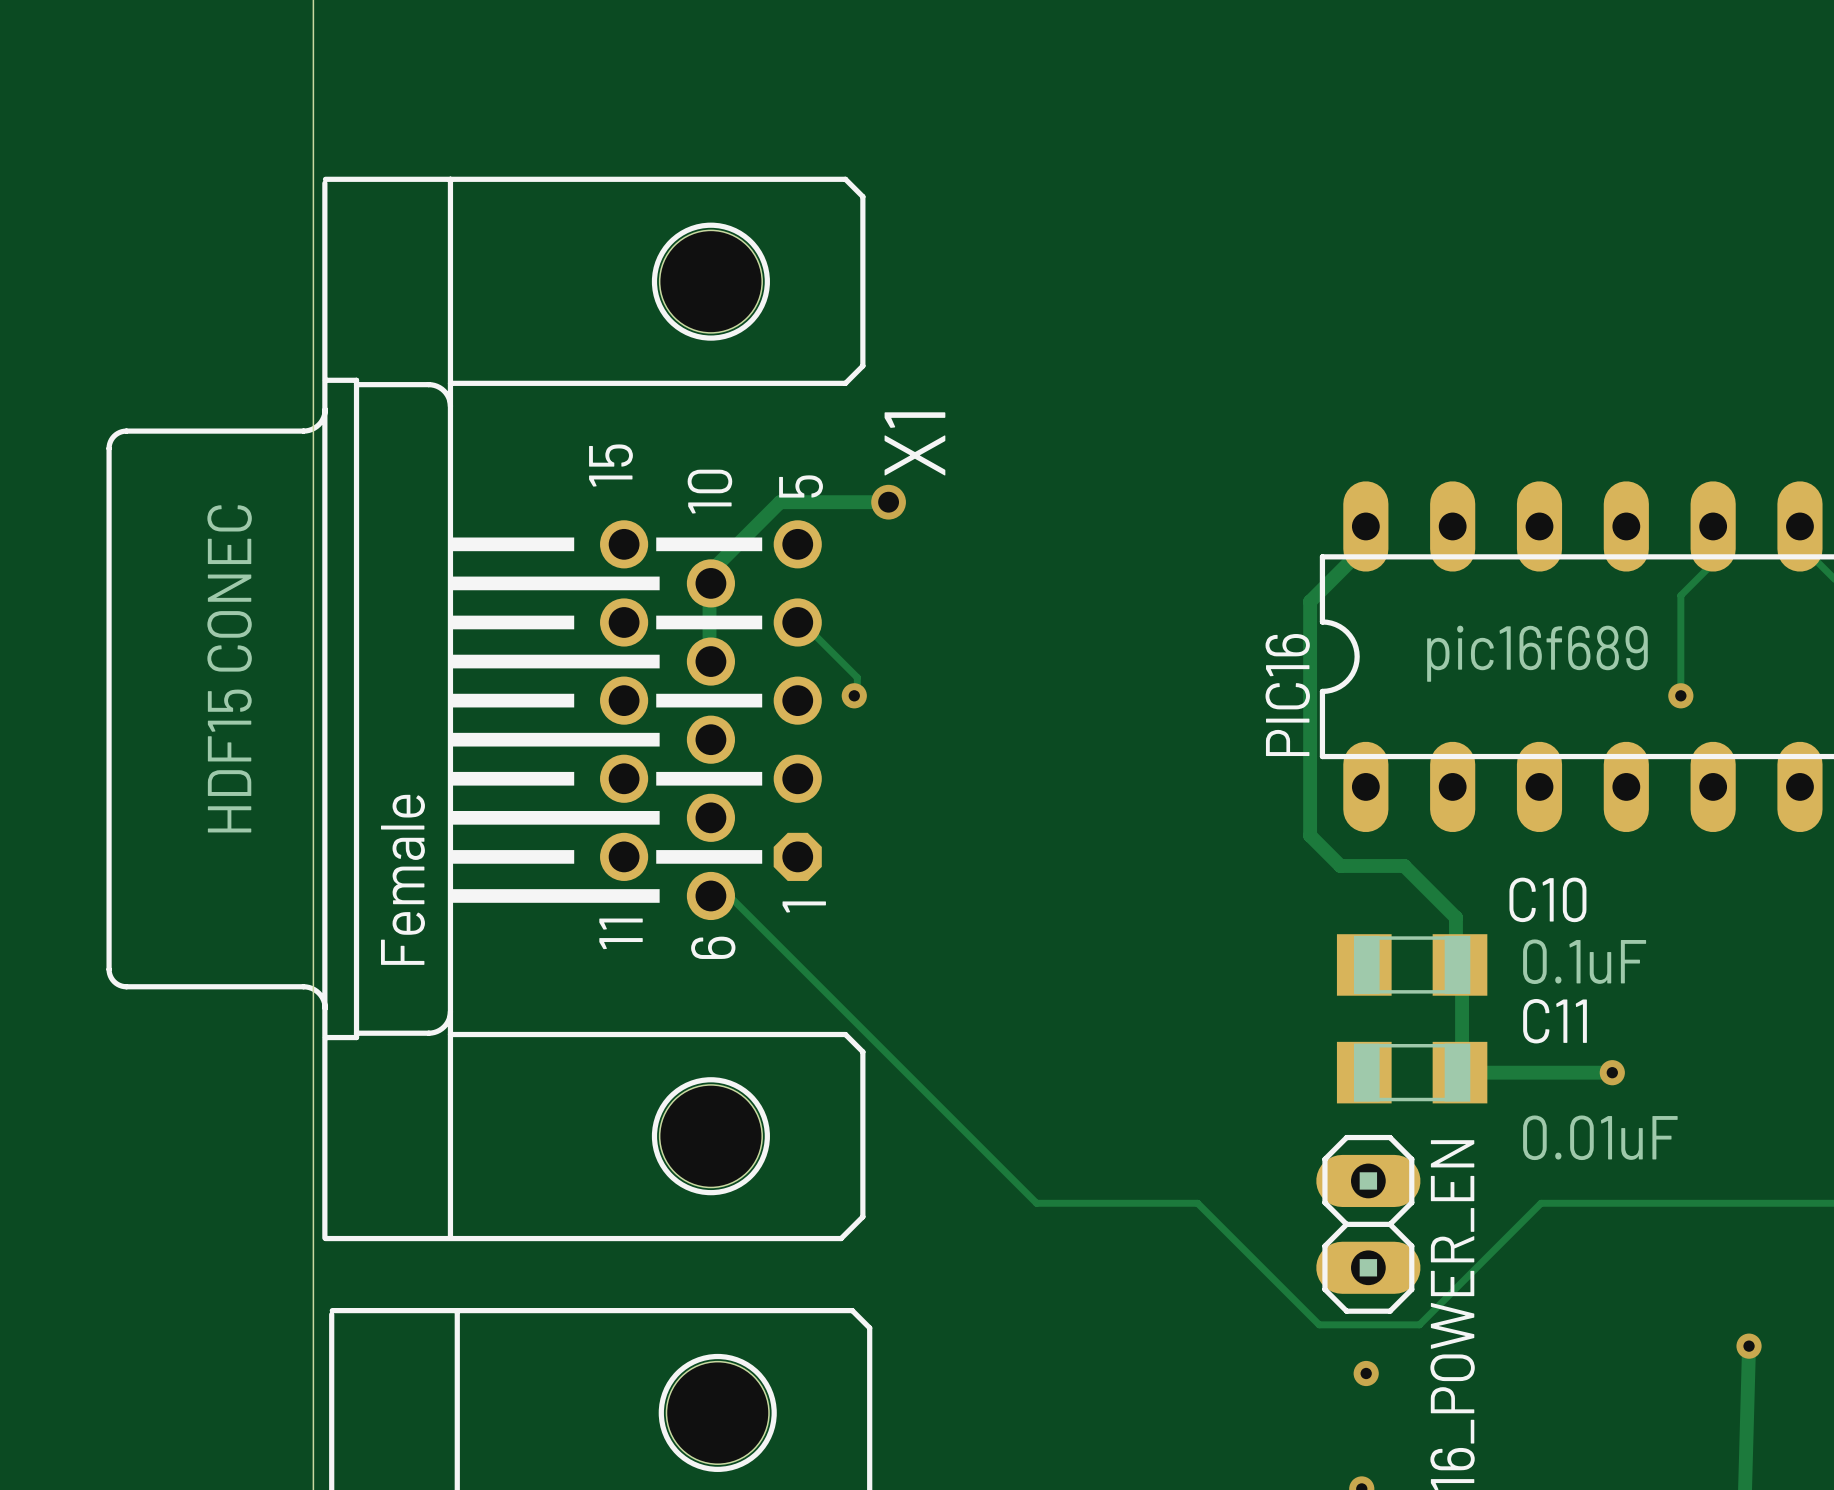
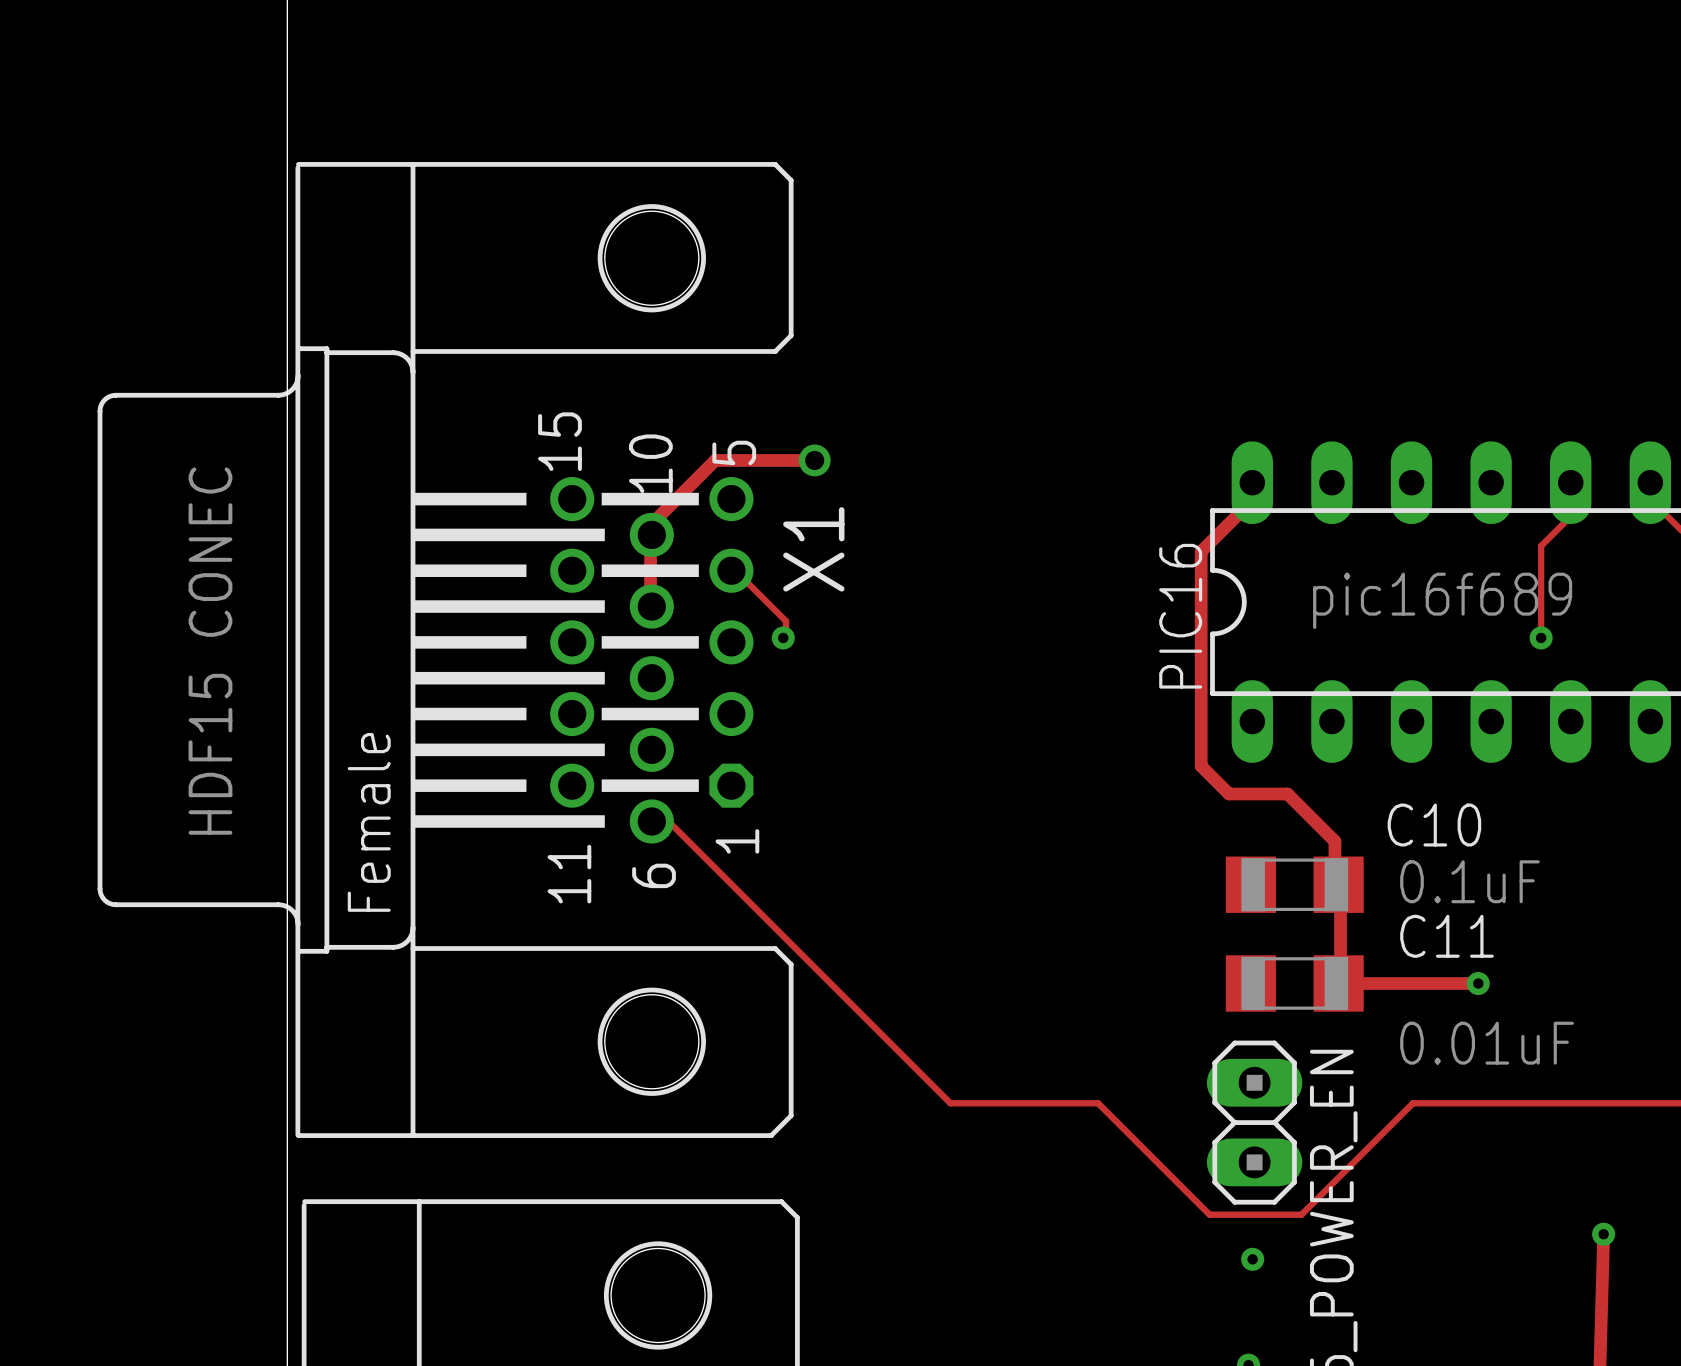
X1 name position: X1 (914, 443) -> X1 (813, 549)

